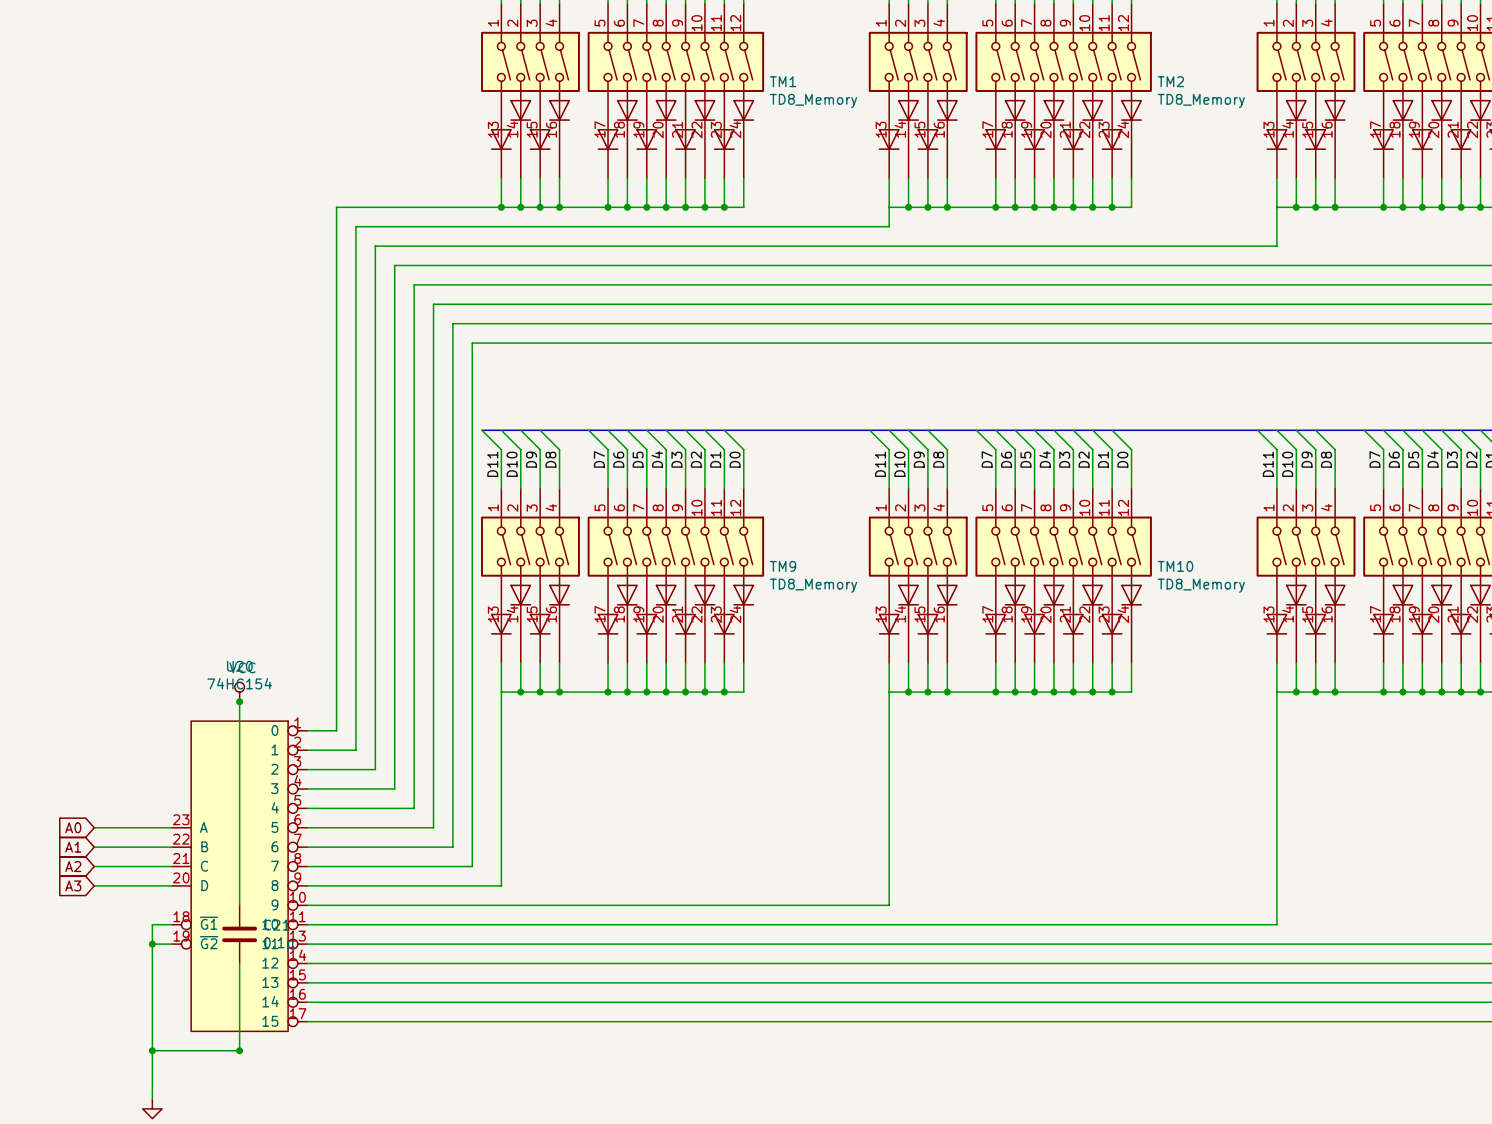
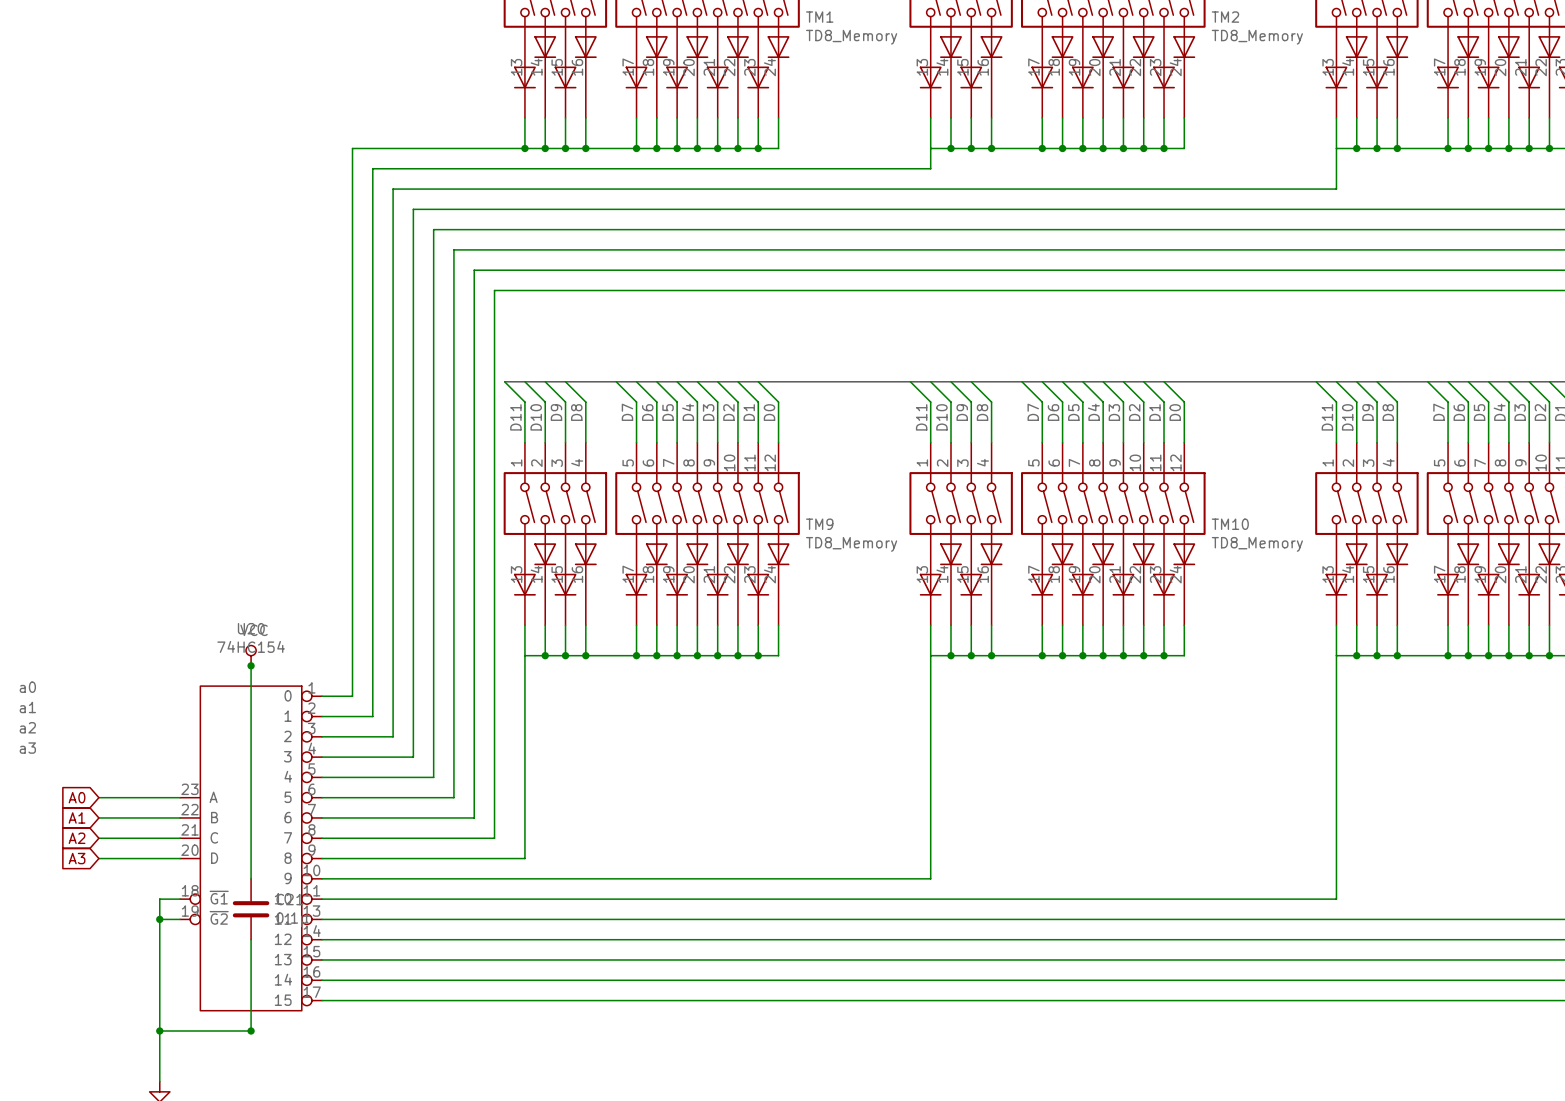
label: none -> a0 (27, 687)
label: none -> a1 (27, 707)
label: none -> a2 (27, 727)
label: none -> a3 (27, 748)

